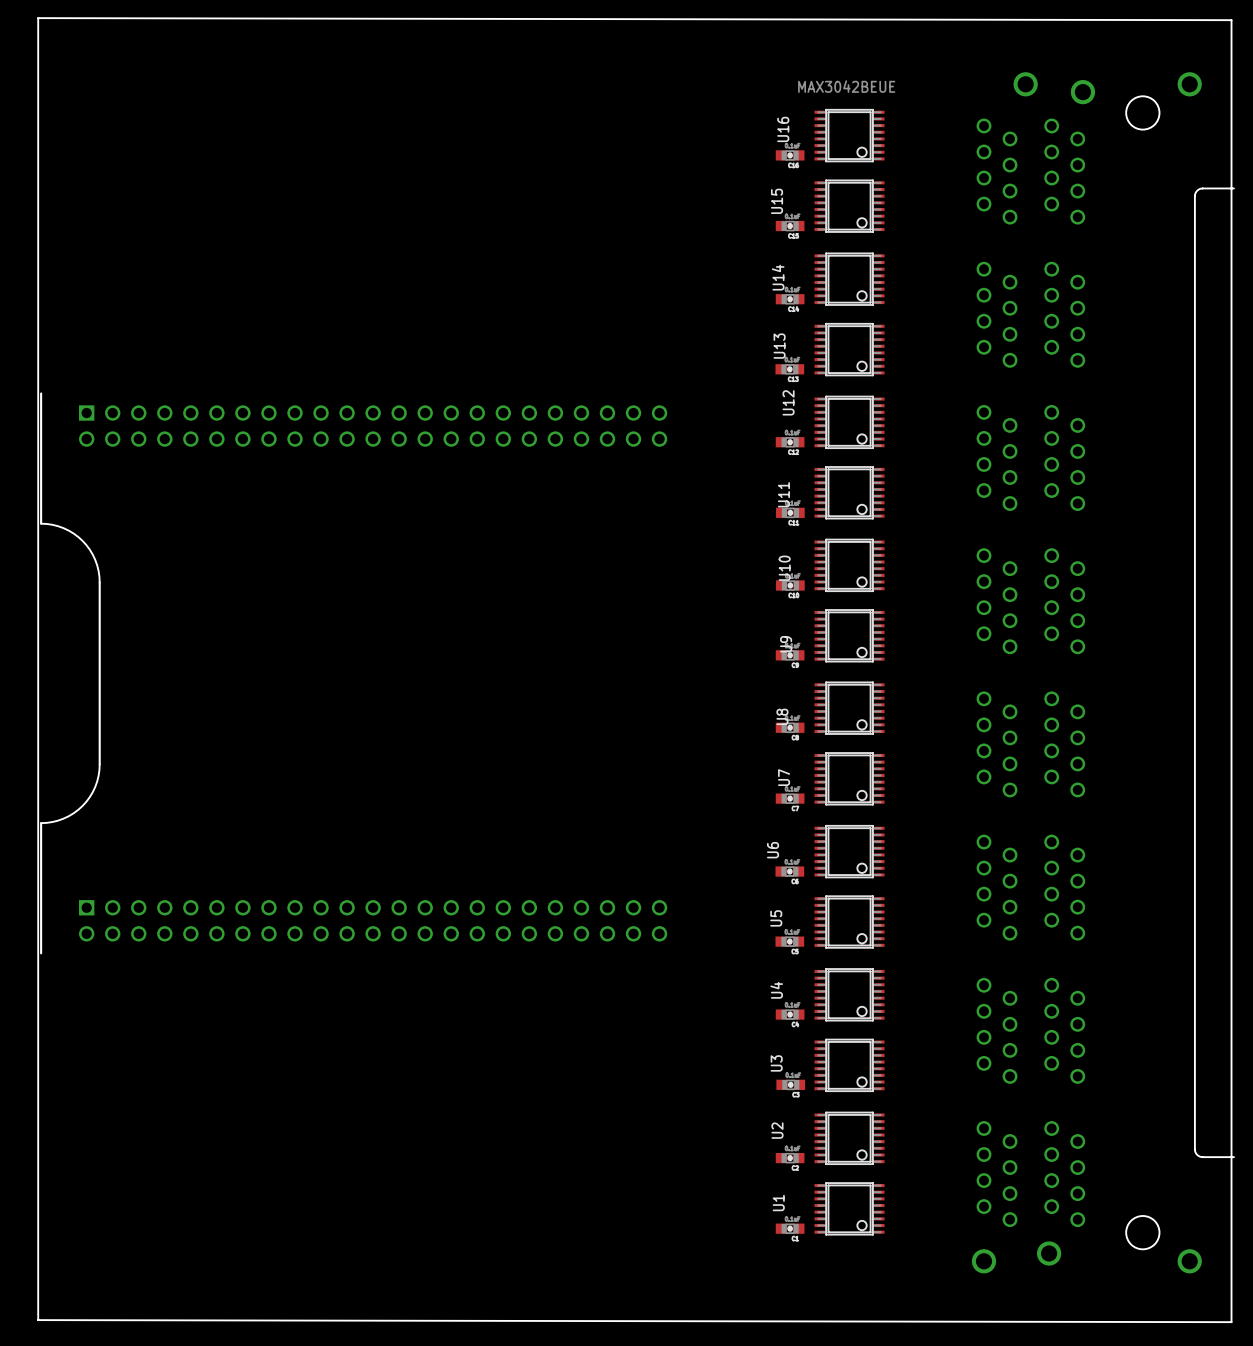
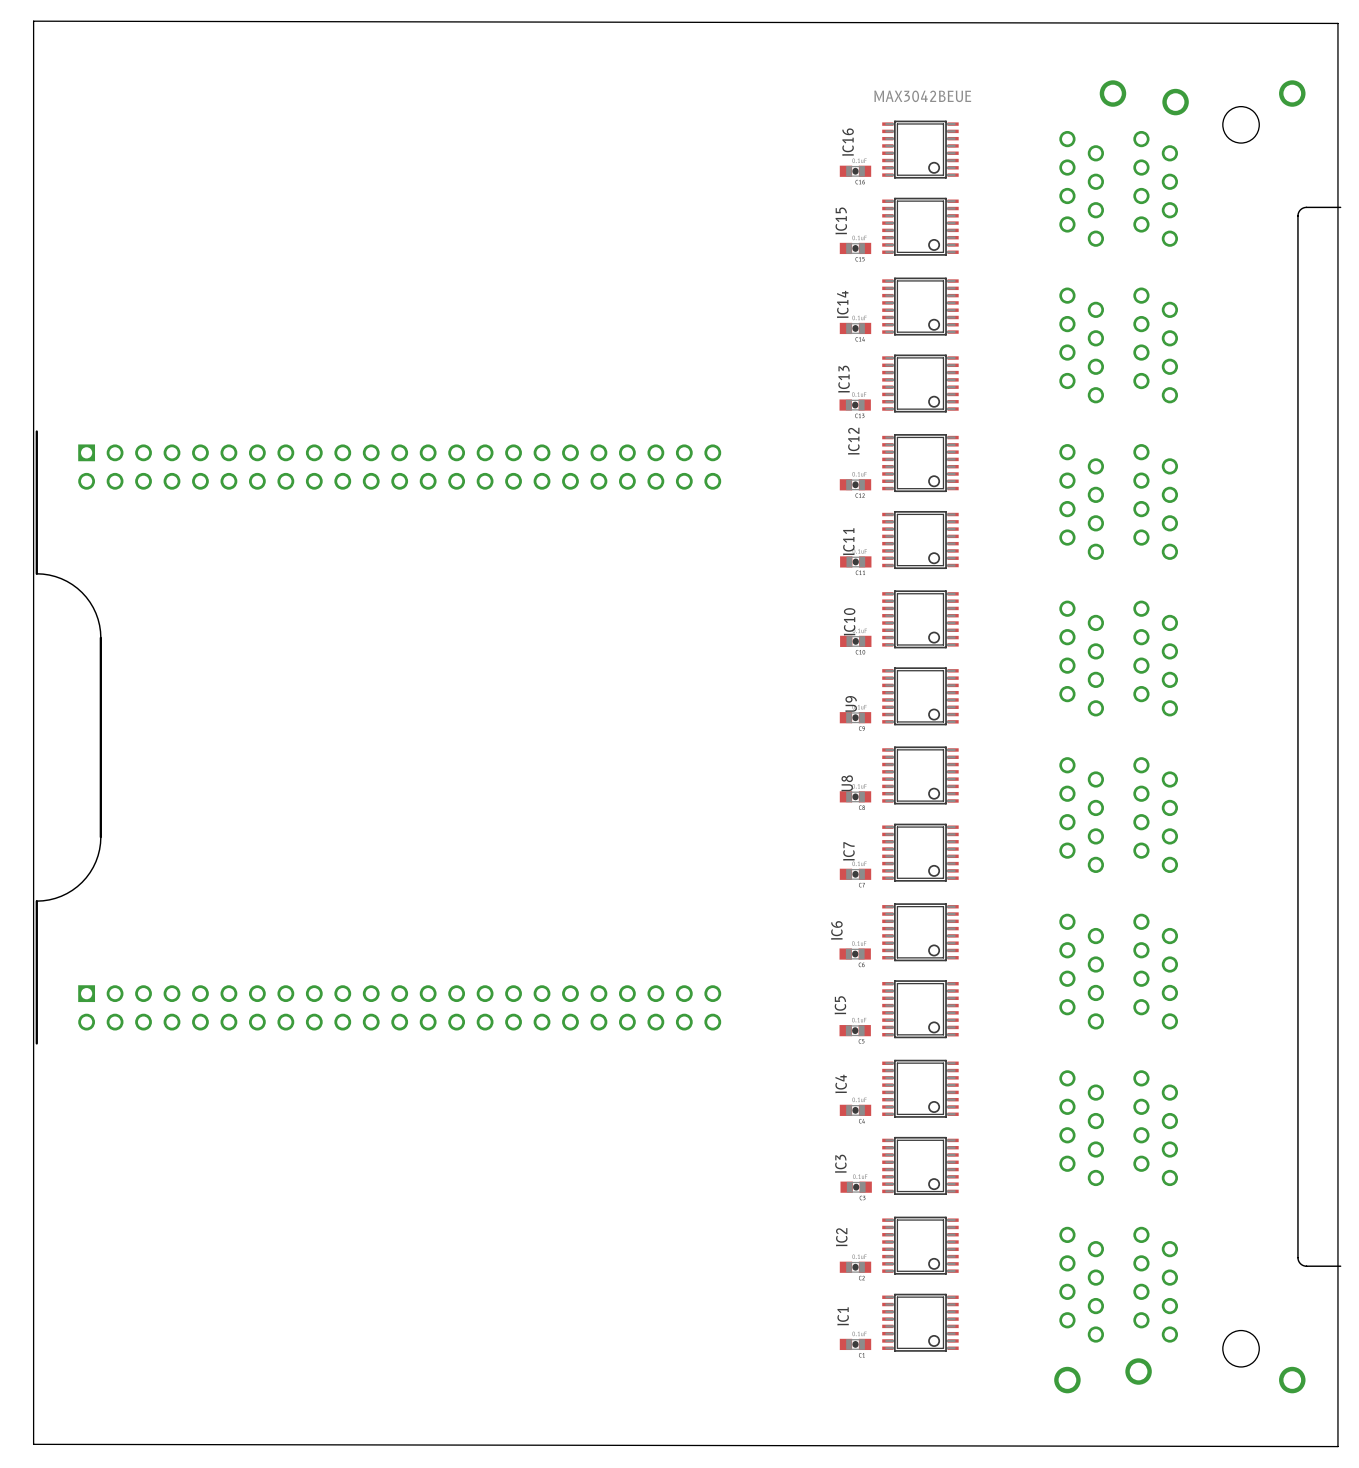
U16 name: U16 (783, 129) -> IC16 (848, 142)
U15 name: U15 (777, 201) -> IC15 (841, 220)
U14 name: U14 (778, 277) -> IC14 (842, 304)
U13 name: U13 (779, 346) -> IC13 (844, 379)
U12 name: U12 (788, 402) -> IC12 (853, 441)
U11 name: U11 (783, 494) -> IC11 (848, 541)
U10 name: U10 (784, 568) -> IC10 (849, 621)
U7 name: U7 (784, 777) -> IC7 (848, 851)
U6 name: U6 (773, 850) -> IC6 (836, 930)
U5 name: U5 (776, 918) -> IC5 (840, 1005)
U4 name: U4 (776, 990) -> IC4 (841, 1083)
U3 name: U3 (776, 1063) -> IC3 (840, 1163)
U2 name: U2 (777, 1130) -> IC2 (841, 1237)
U1 name: U1 (778, 1203) -> IC1 (843, 1316)

